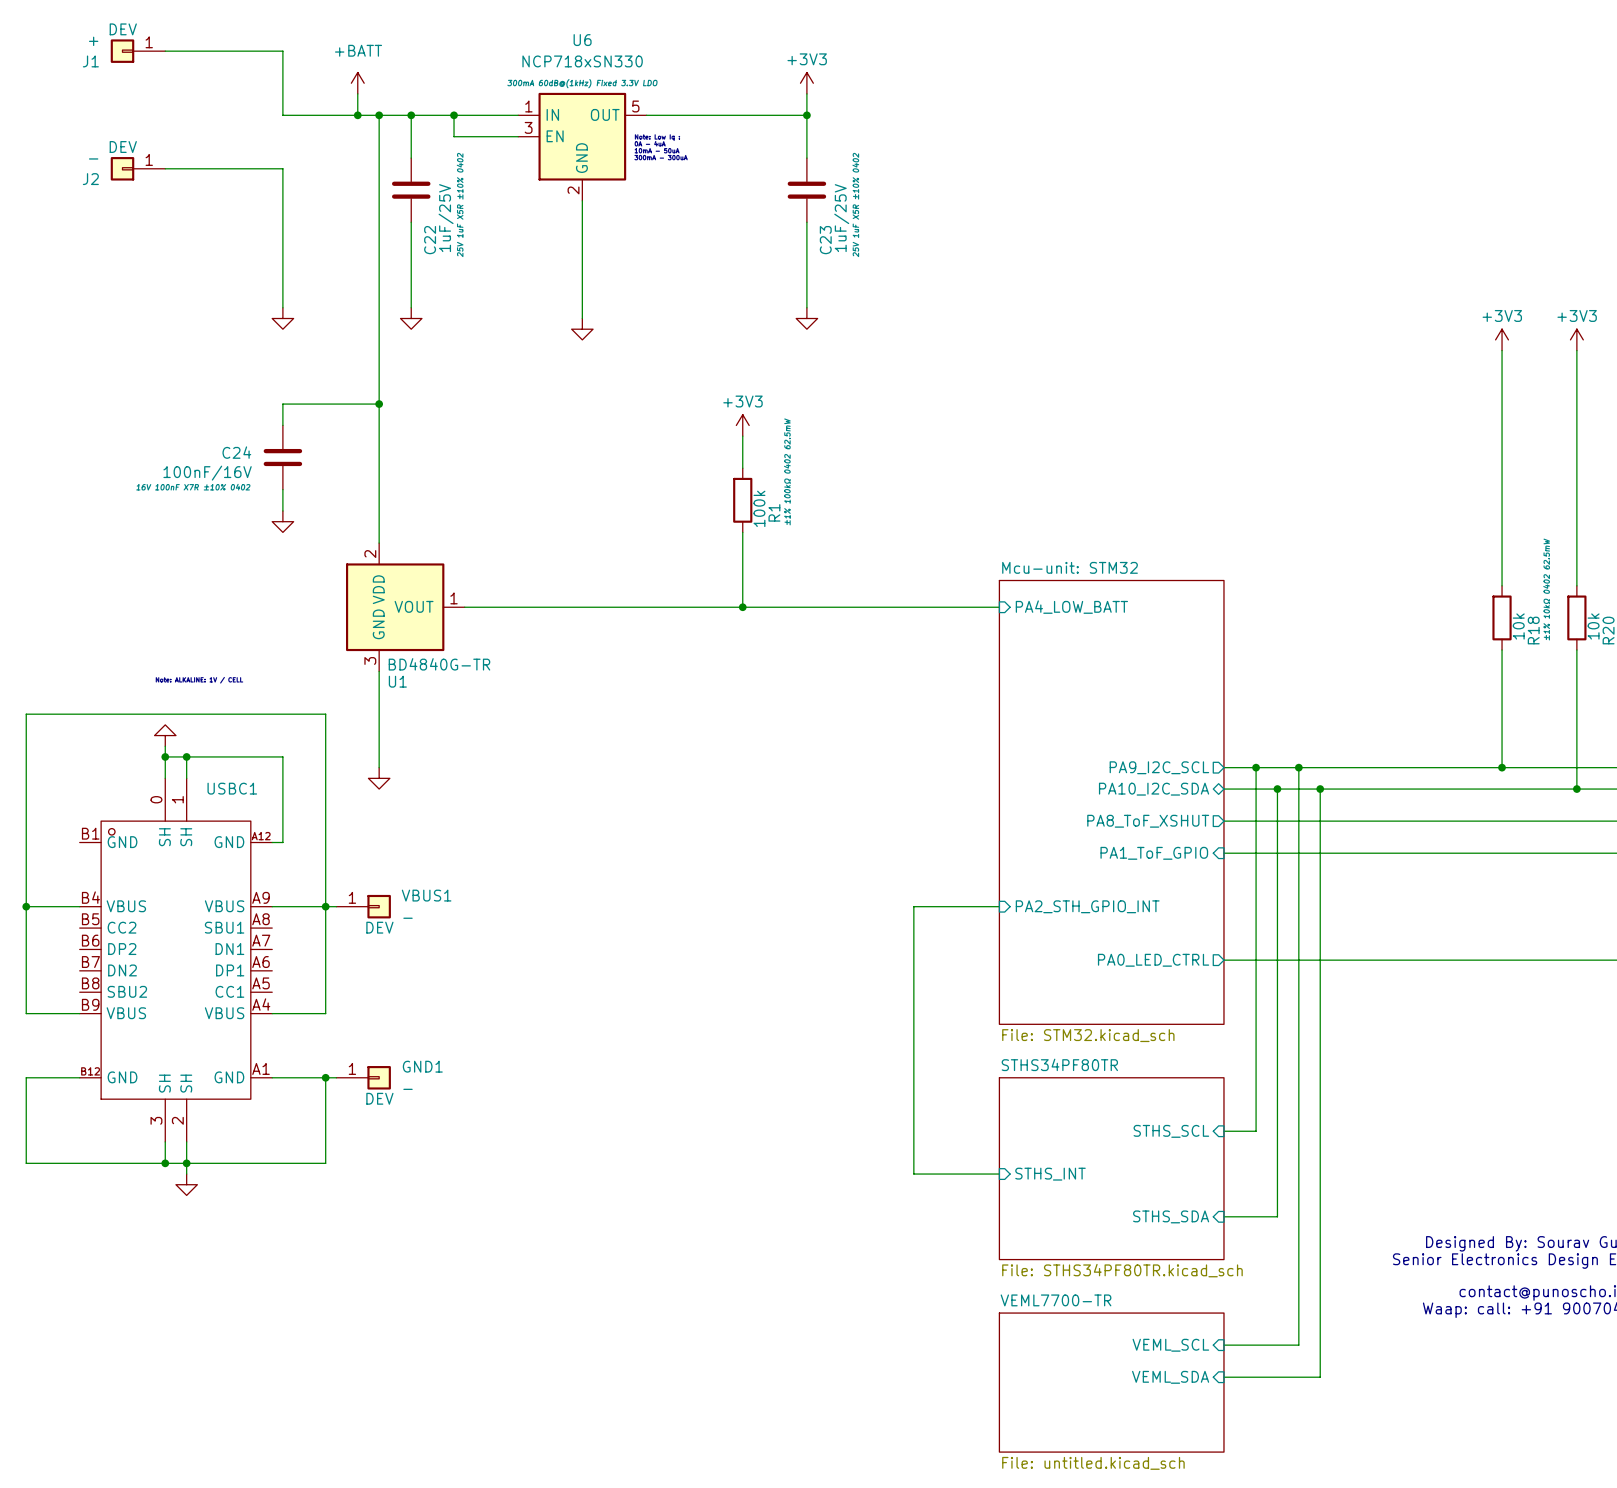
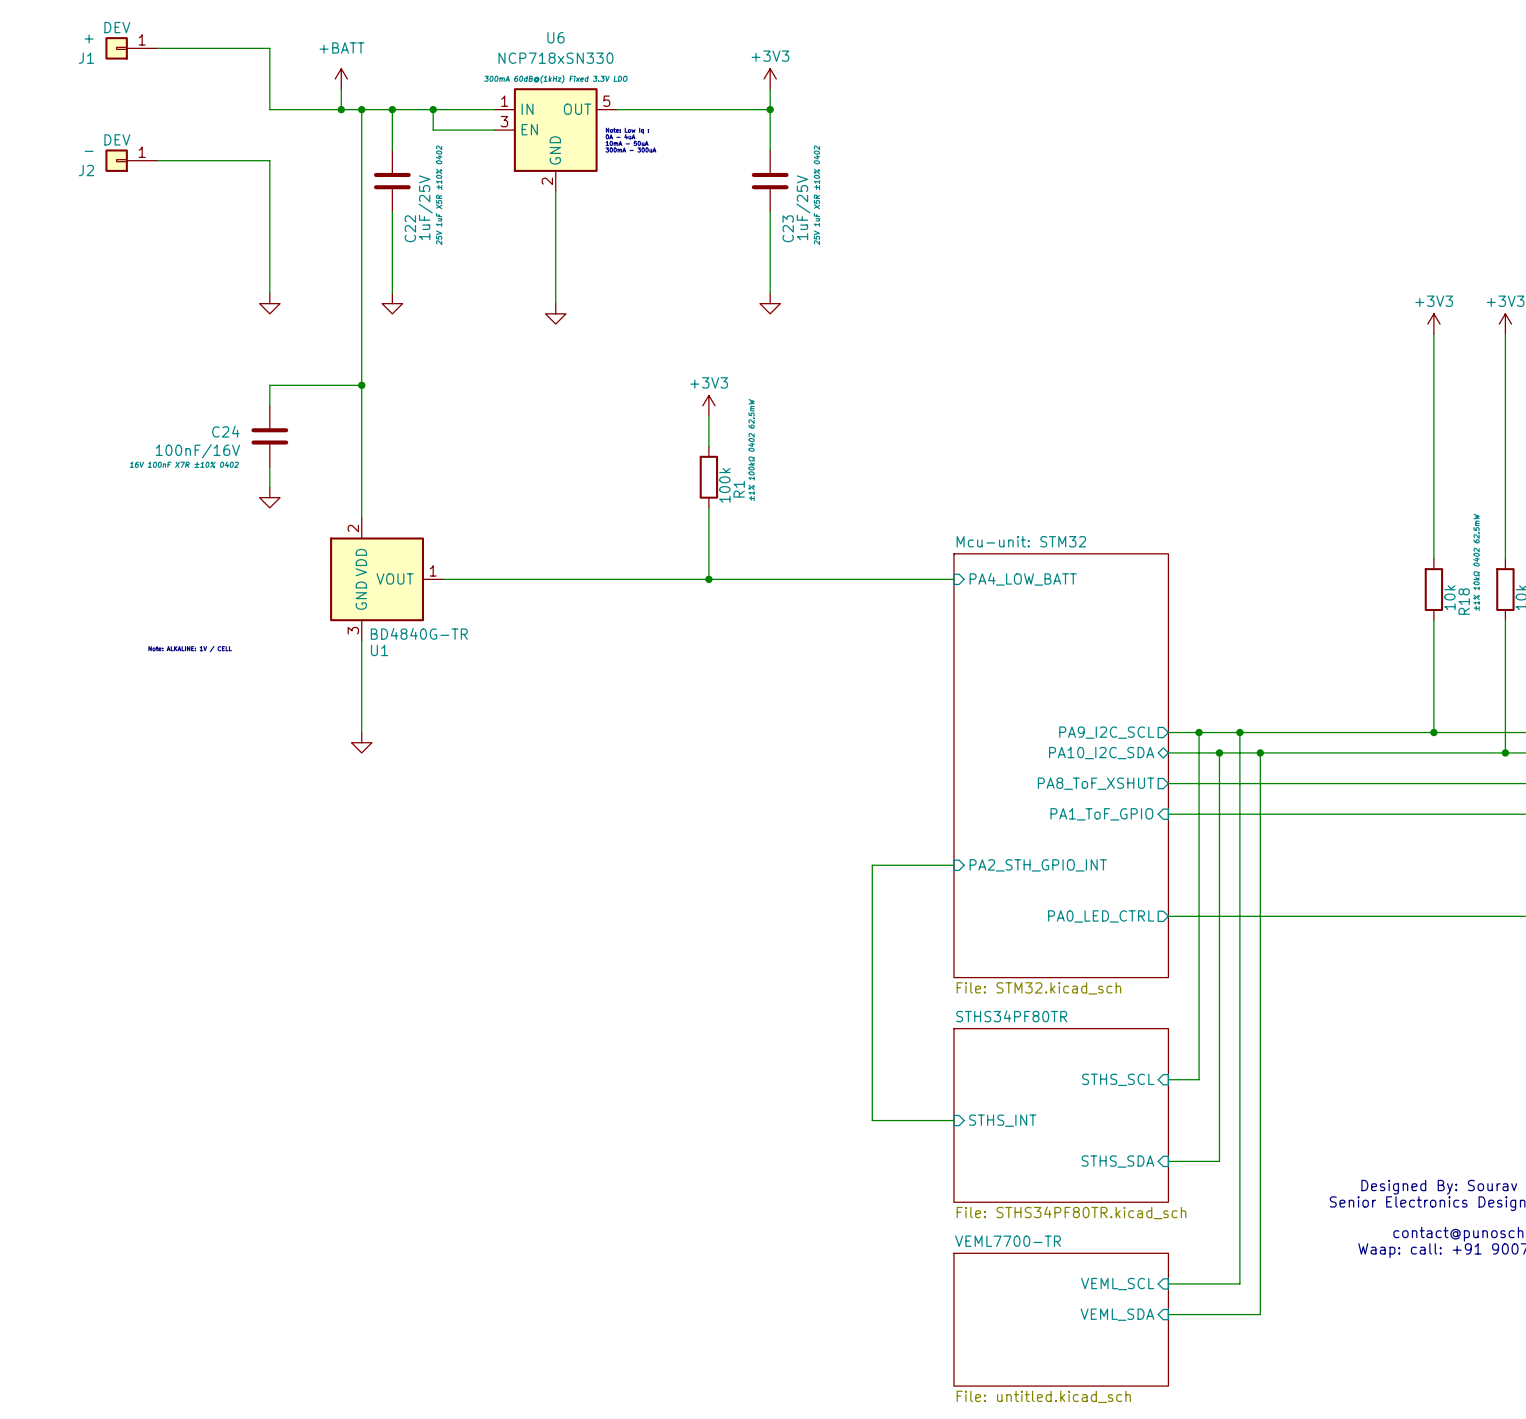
power symbol: (165, 735) -> none
wire: (165, 746) (165, 778) -> none
wire: (165, 756) (282, 756) (282, 842) (272, 842) -> none
junction: (165, 756) -> none
wire: (186, 756) (186, 778) -> none
junction: (186, 756) -> none
wire: (26, 906) (79, 906) -> none
junction: (26, 906) -> none
wire: (272, 906) (336, 906) -> none
junction: (325, 906) -> none
VBUS1: - (363, 906) -> none
USBC1: (175, 960) -> none
wire: (79, 1013) (26, 1013) (26, 714) (325, 714) (325, 1013) (272, 1013) -> none
wire: (79, 1077) (26, 1077) (26, 1163) (325, 1163) (325, 1077) -> none
wire: (272, 1077) (336, 1077) -> none
junction: (325, 1077) -> none
GND1: - (363, 1077) -> none
wire: (165, 1141) (165, 1163) -> none
wire: (186, 1141) (186, 1174) -> none
junction: (165, 1163) -> none
junction: (186, 1163) -> none
power symbol: (186, 1184) -> none

